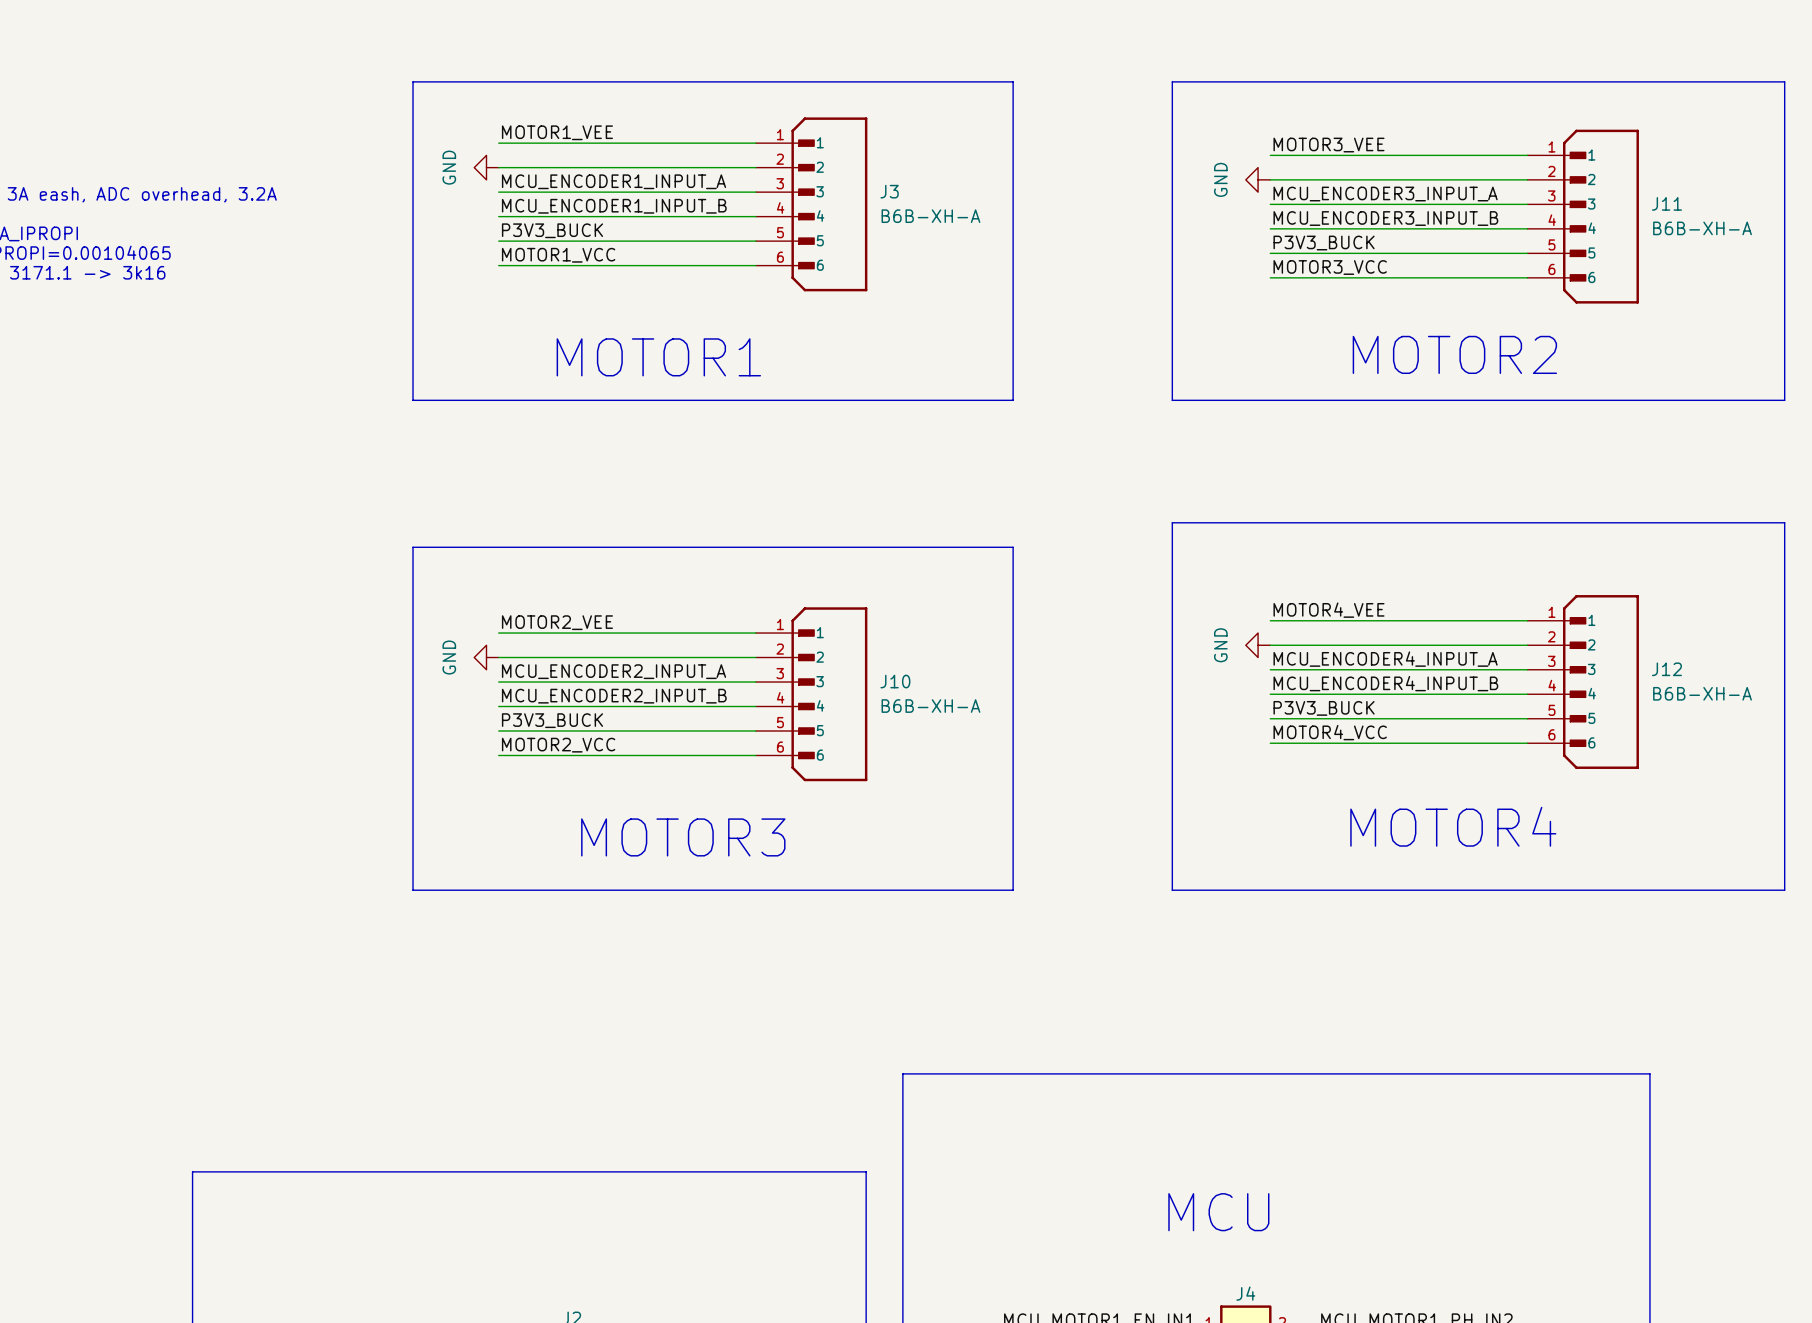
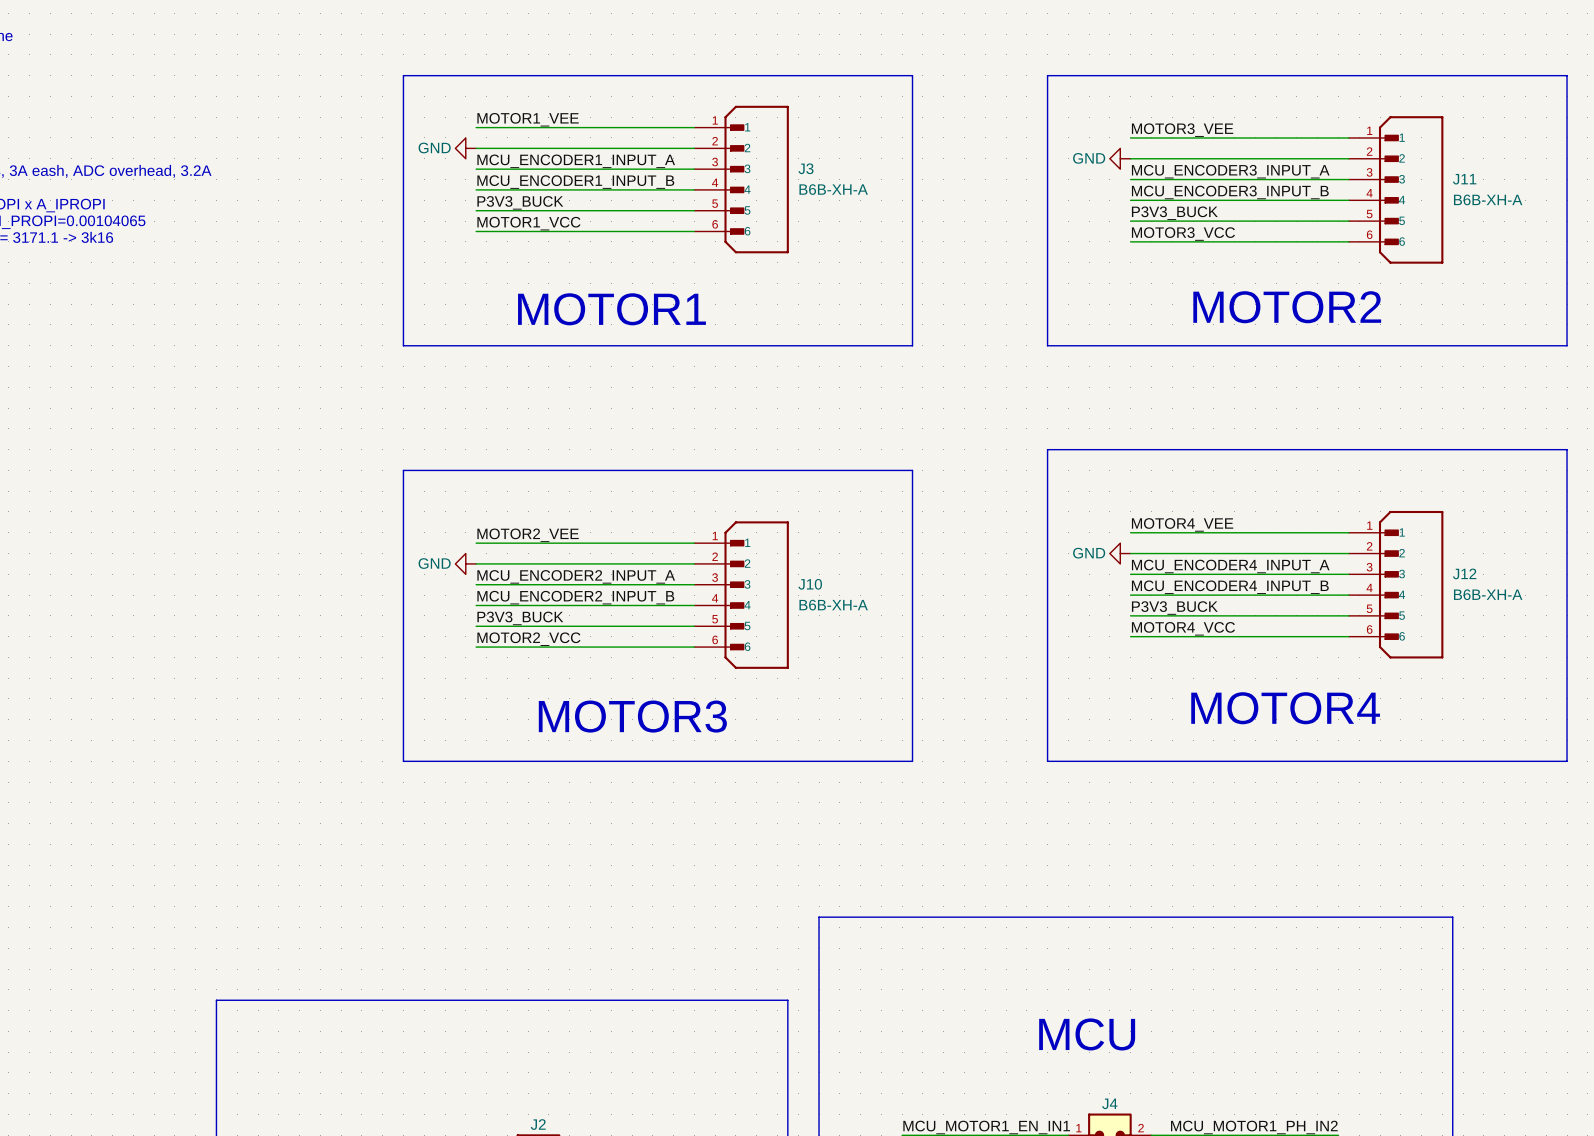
power symbol text rotation: 0° (449, 167) -> 90° clockwise (434, 147)
power symbol text rotation: 0° (1220, 179) -> 90° clockwise (1089, 158)
power symbol text rotation: 0° (1220, 645) -> 90° clockwise (1089, 553)
power symbol text rotation: 0° (449, 657) -> 90° clockwise (434, 563)

